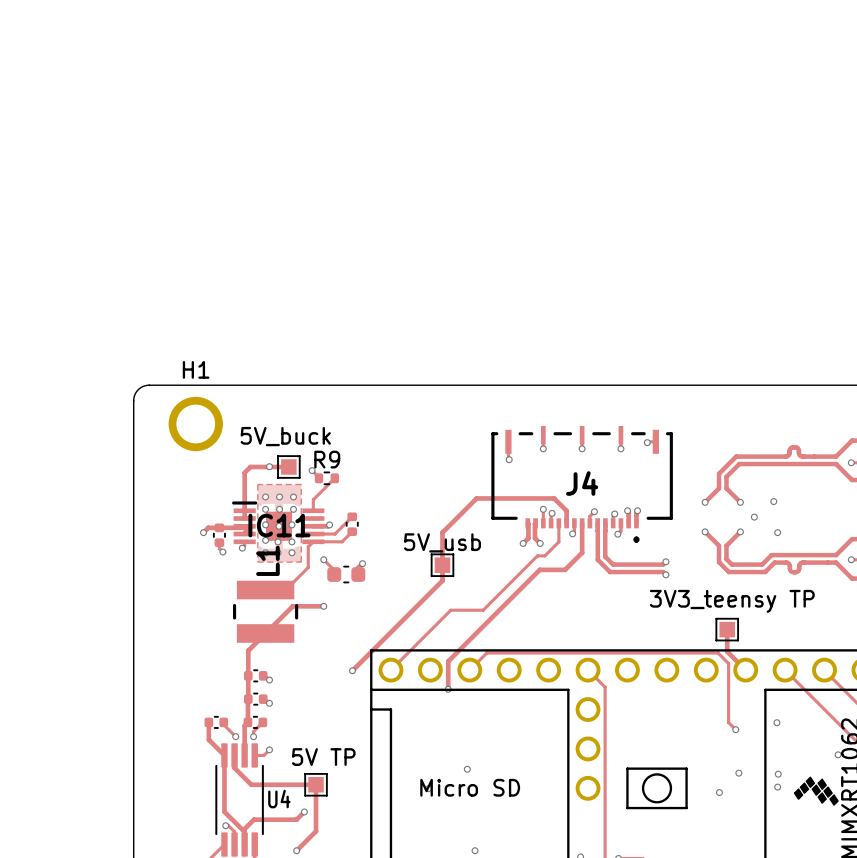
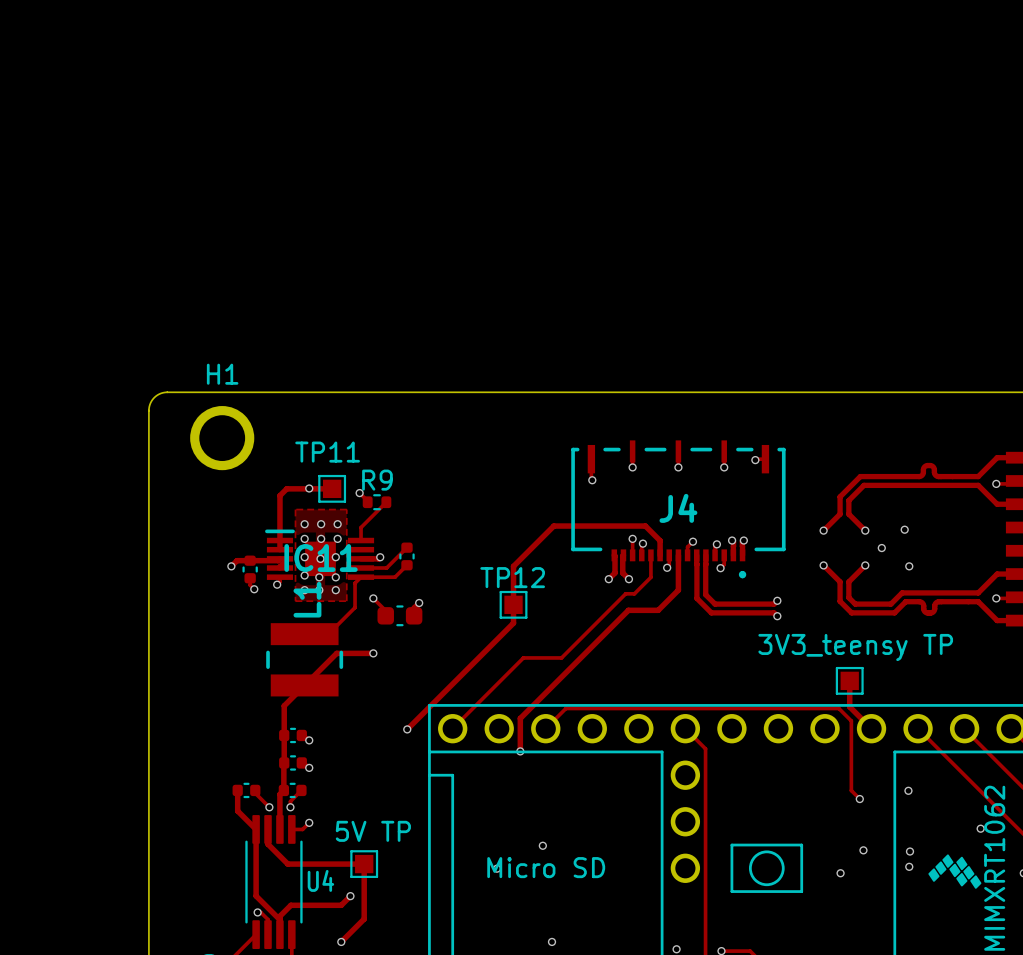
5V_buck name: 5V_buck (285, 436) -> TP11 (327, 452)
5V_usb name: 5V_usb (442, 542) -> TP12 (512, 577)

